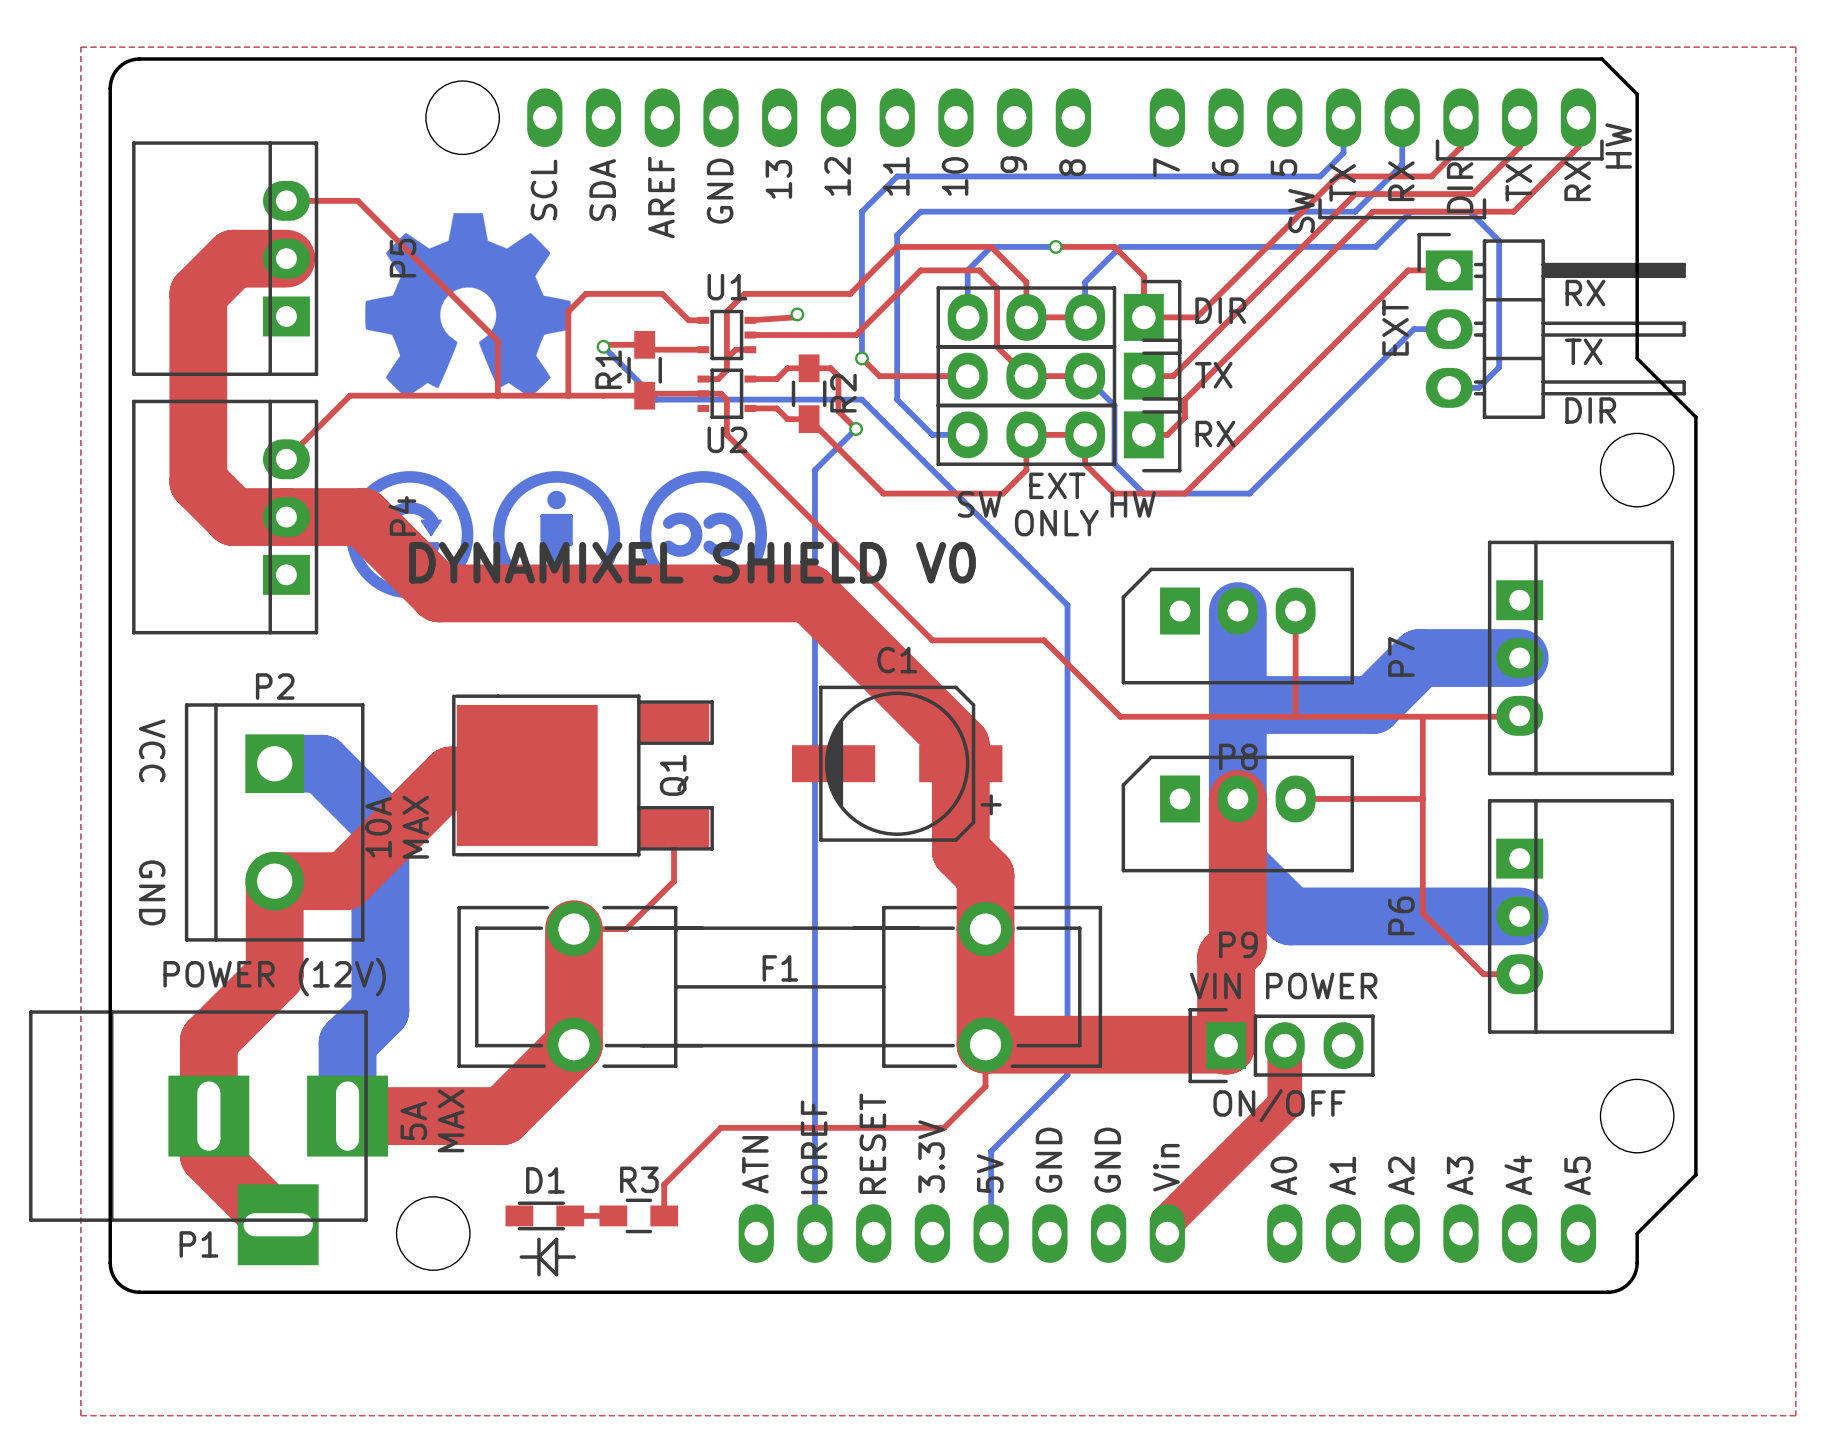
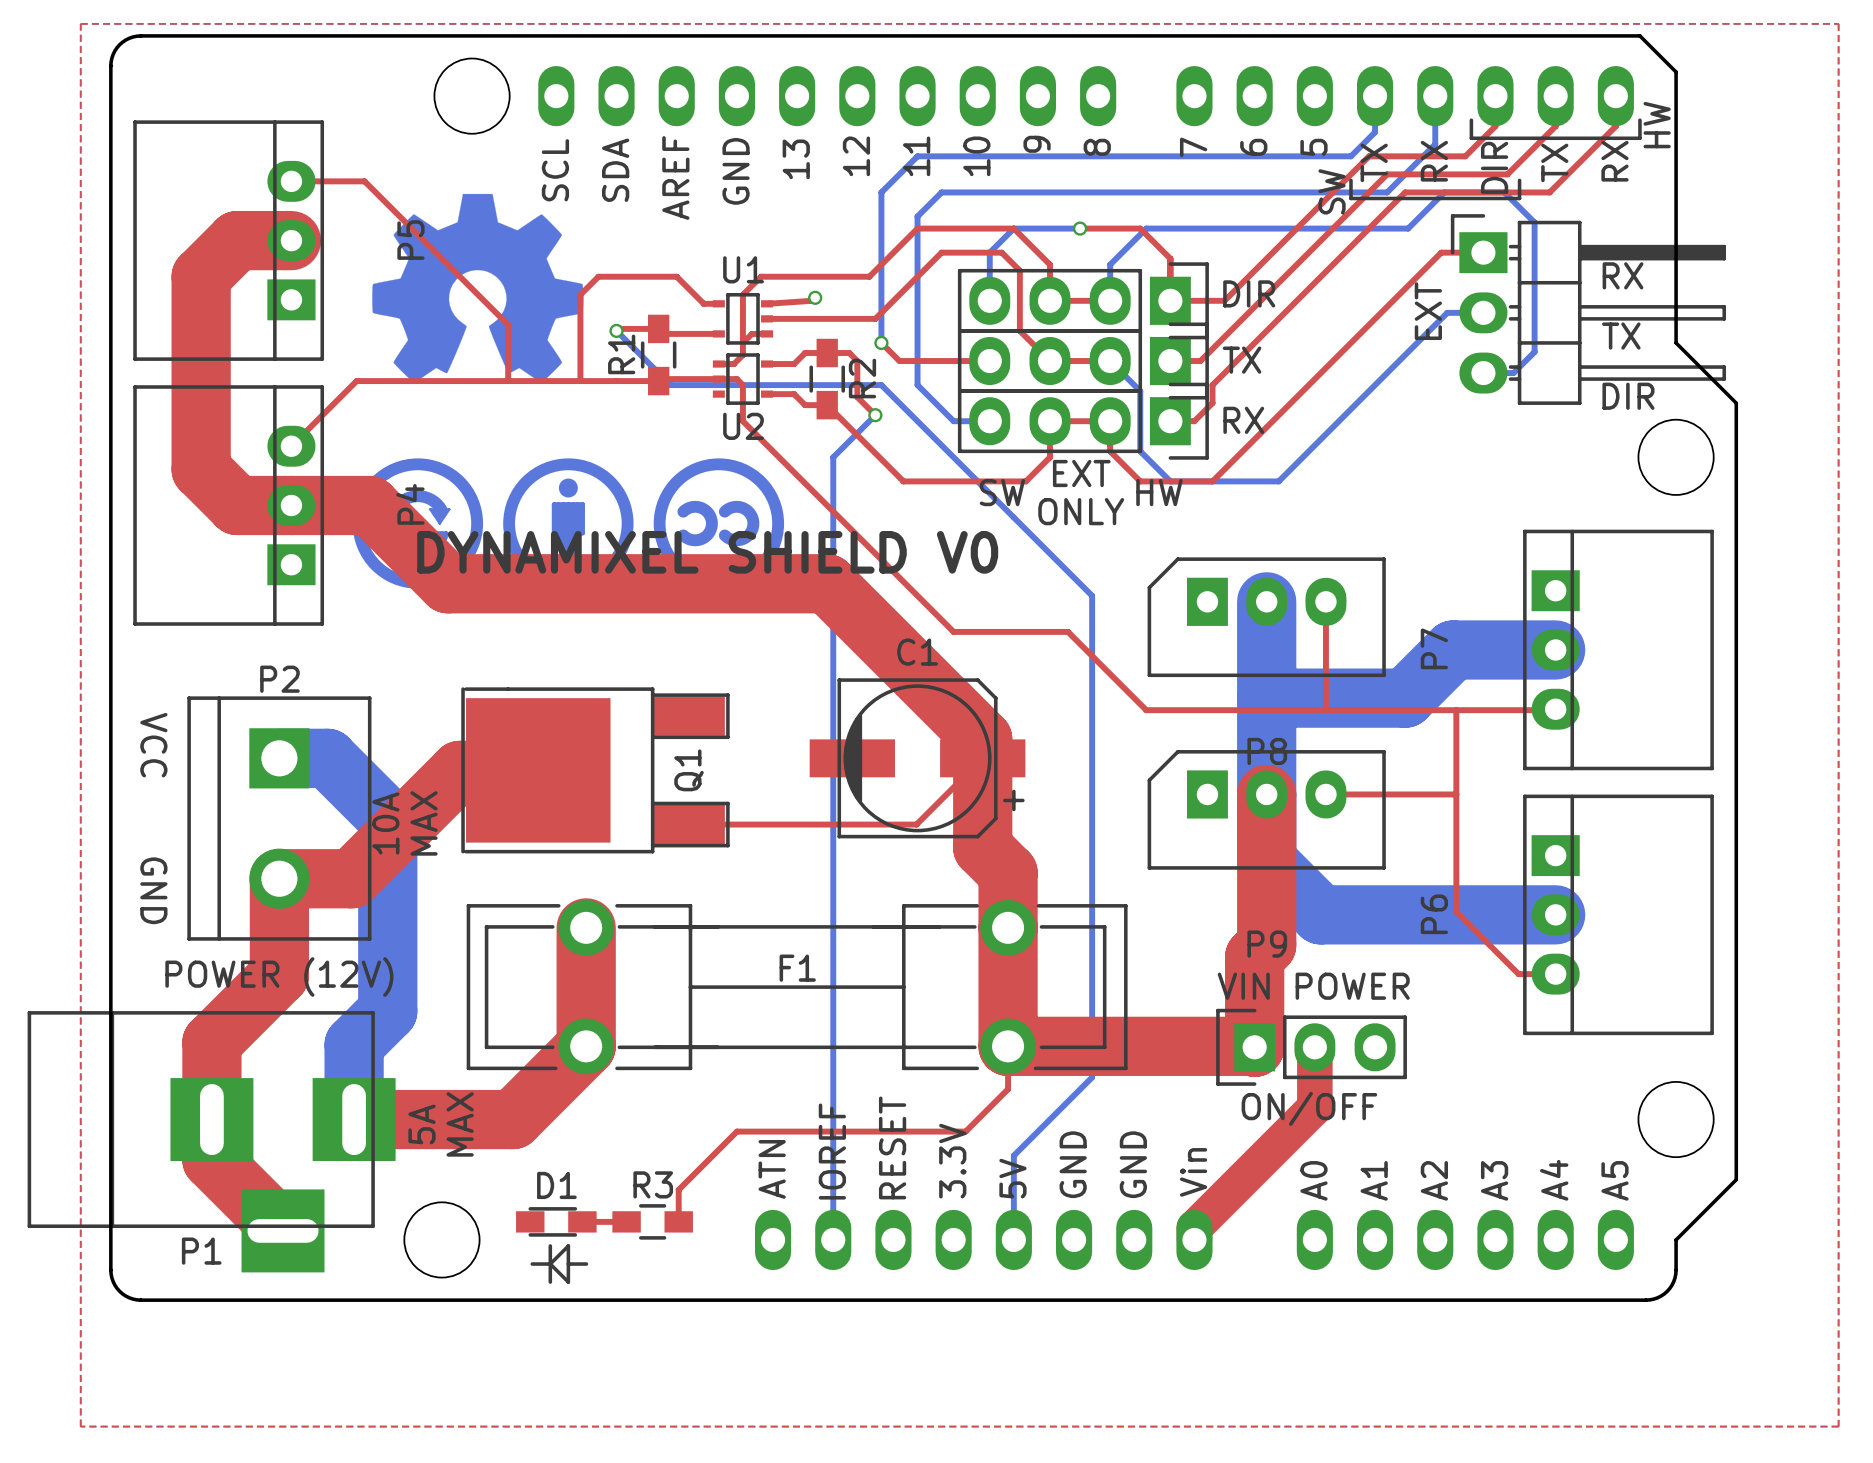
top track: (674, 828) (674, 881) (626, 929) (573, 929) -> (688, 824) (916, 824) (982, 758)

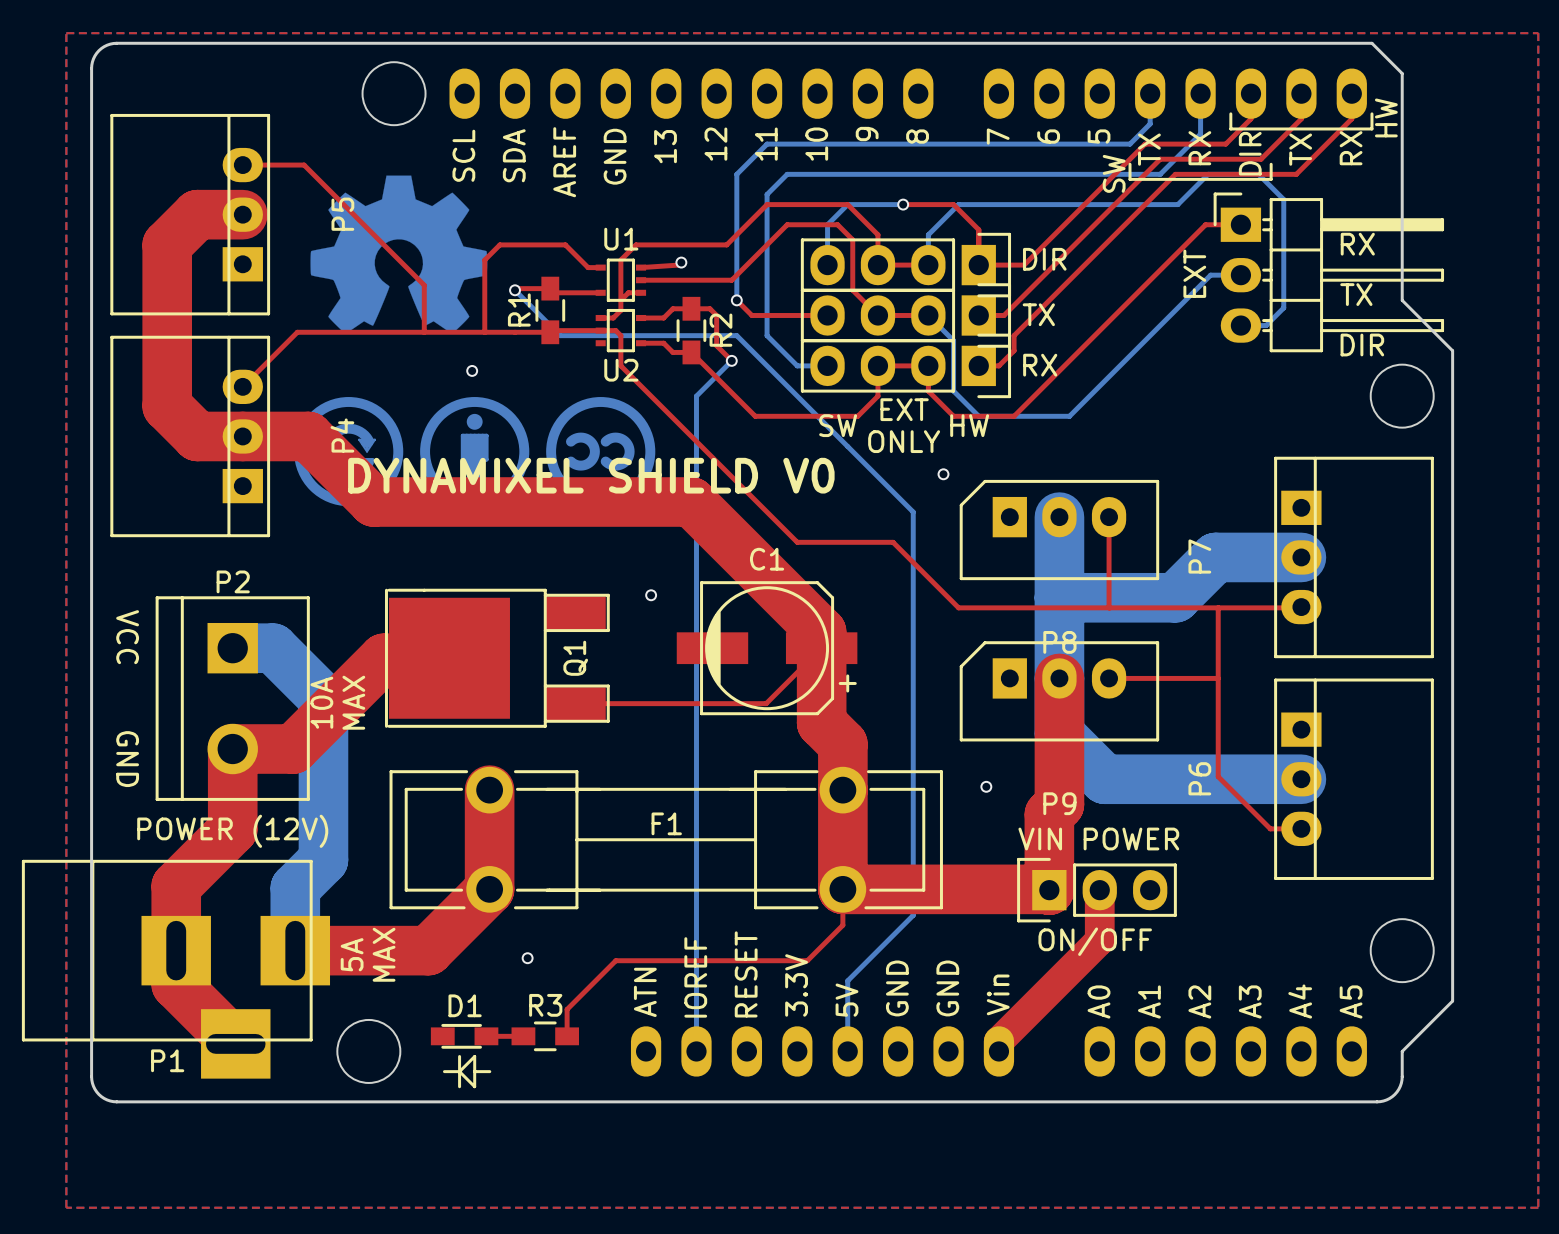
via: none -> (472, 370)
via: none -> (943, 474)
via: none -> (651, 595)
via: none -> (986, 786)
via: none -> (527, 958)

